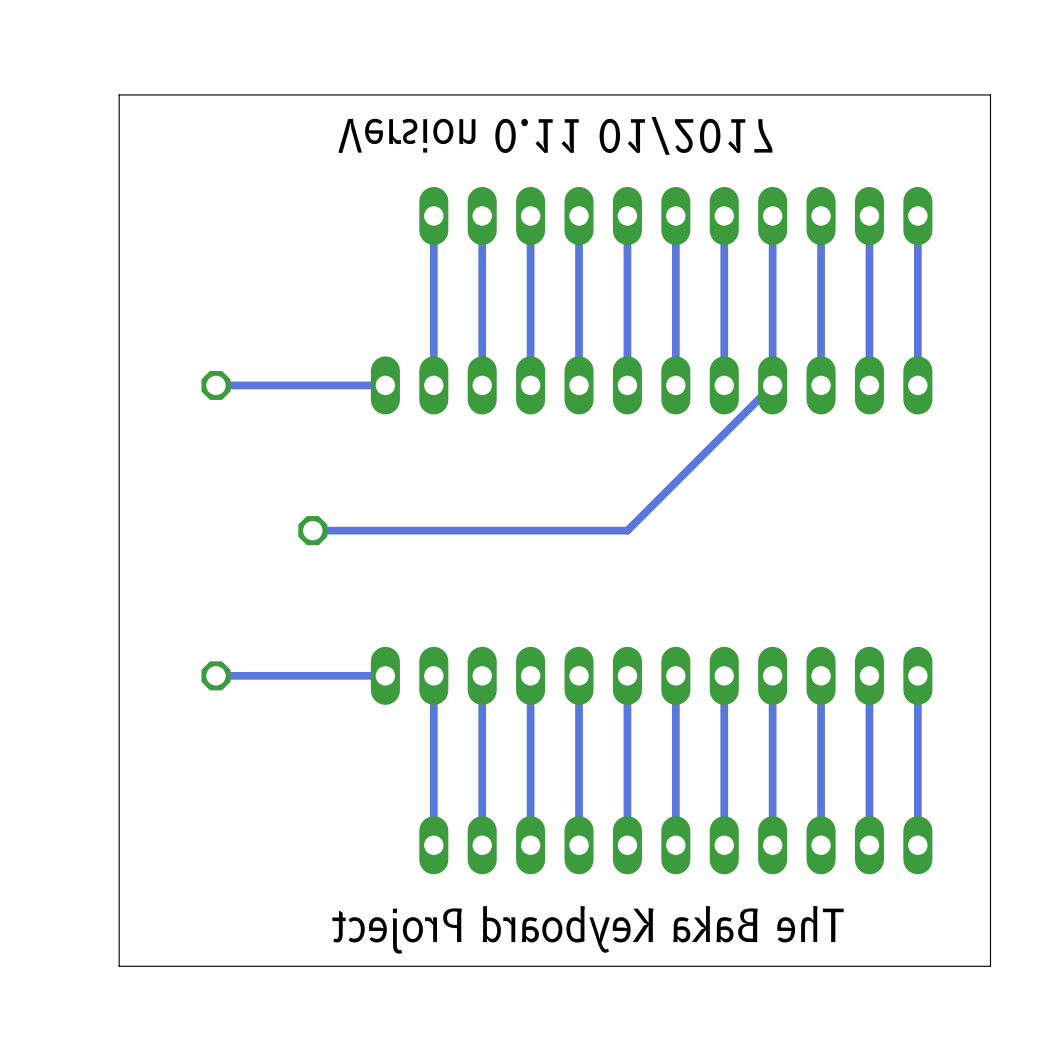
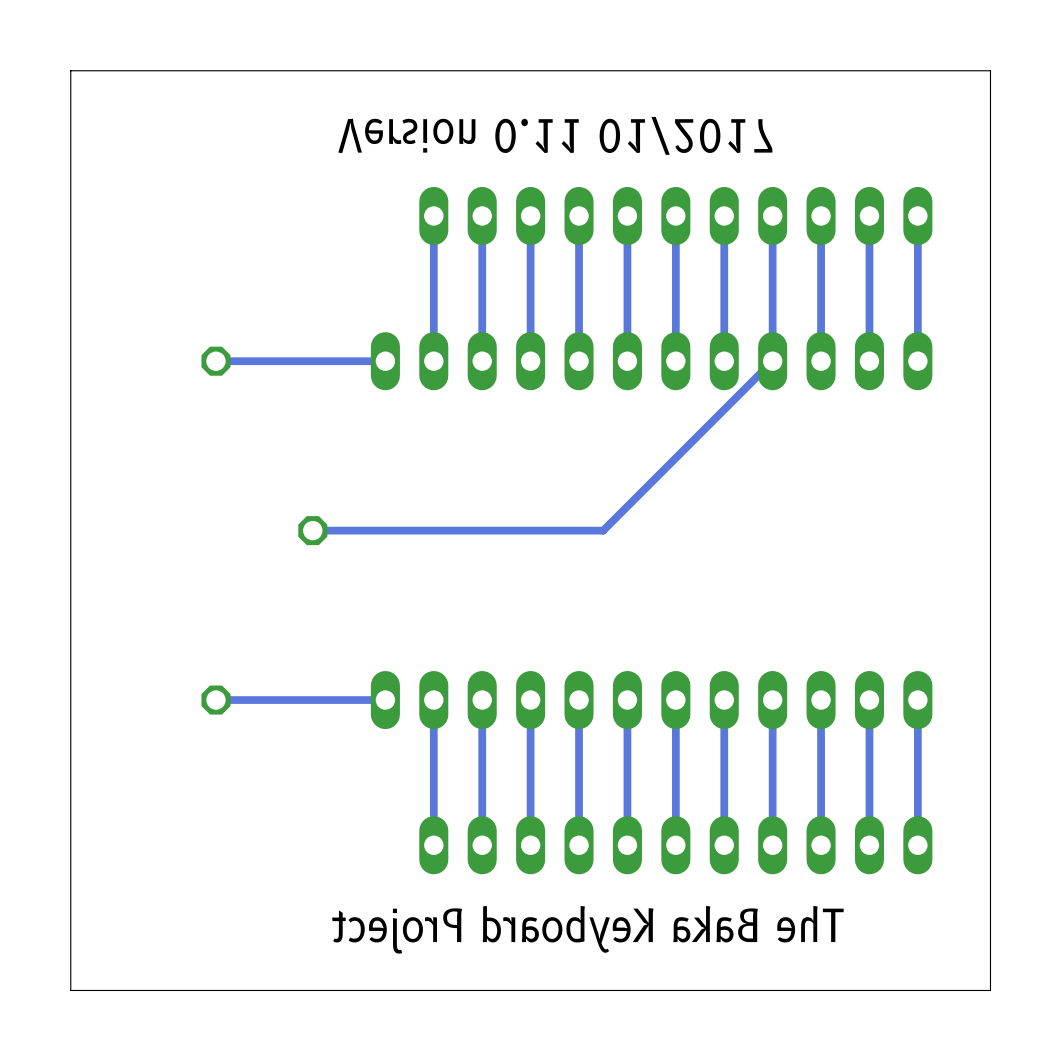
board edge: (990, 94) (119, 94) (119, 966) (990, 966) -> (990, 94) (990, 70) (70, 70) (70, 990) (990, 990) (990, 966)
bottom track: (772, 361) (772, 385) (627, 530) (603, 530) -> (772, 361) (603, 530)
part position: (215, 385) -> (215, 361)
bottom track: (385, 385) (215, 385) -> (385, 361) (215, 361)
part position: (651, 385) -> (651, 361)
part position: (215, 675) -> (215, 700)
bottom track: (385, 675) (215, 675) -> (385, 700) (215, 700)
part position: (651, 675) -> (651, 700)

